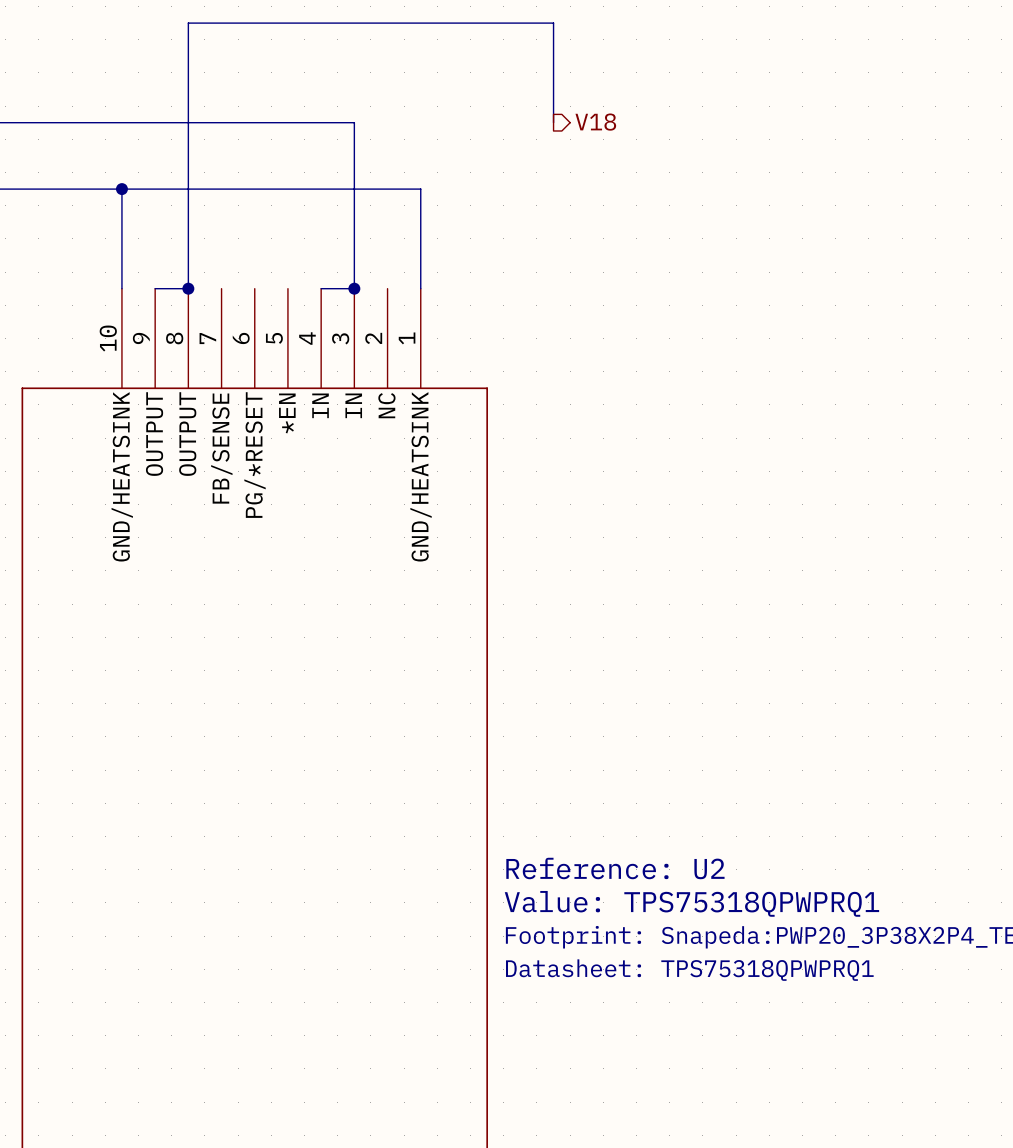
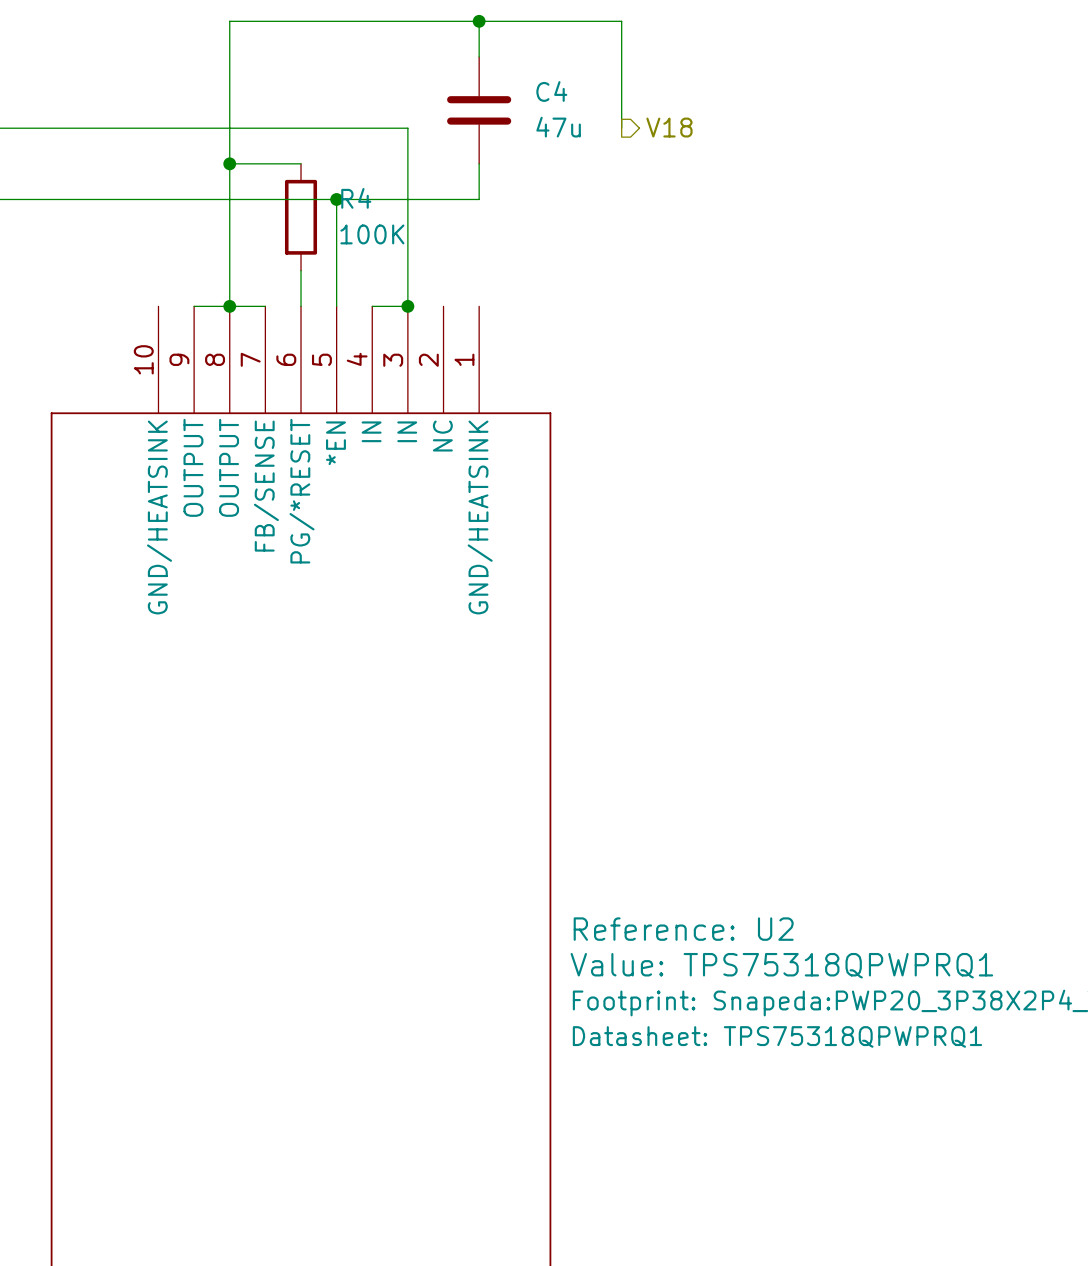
wire: none -> (479, 21) (479, 56)
junction: none -> (479, 21)
C4: none -> 47u (479, 110)
wire: none -> (229, 163) (301, 163)
wire: (121, 189) (121, 288) -> (336, 199) (336, 306)
junction position: (121, 189) -> (229, 163)
junction: none -> (336, 199)
wire: (420, 189) (420, 288) -> (479, 199) (479, 163)
R4: none -> 100K (301, 217)
wire: none -> (301, 270) (301, 306)
wire: none -> (229, 306) (265, 306)

